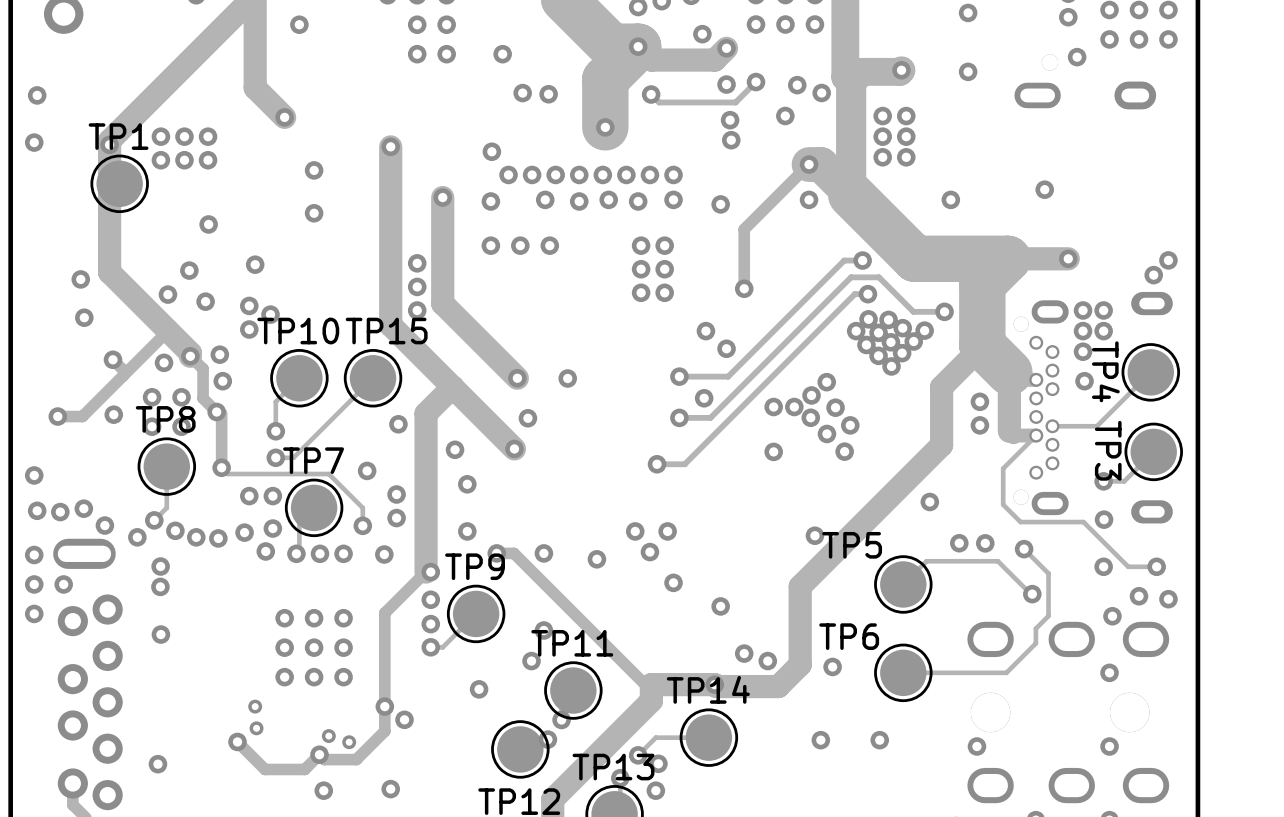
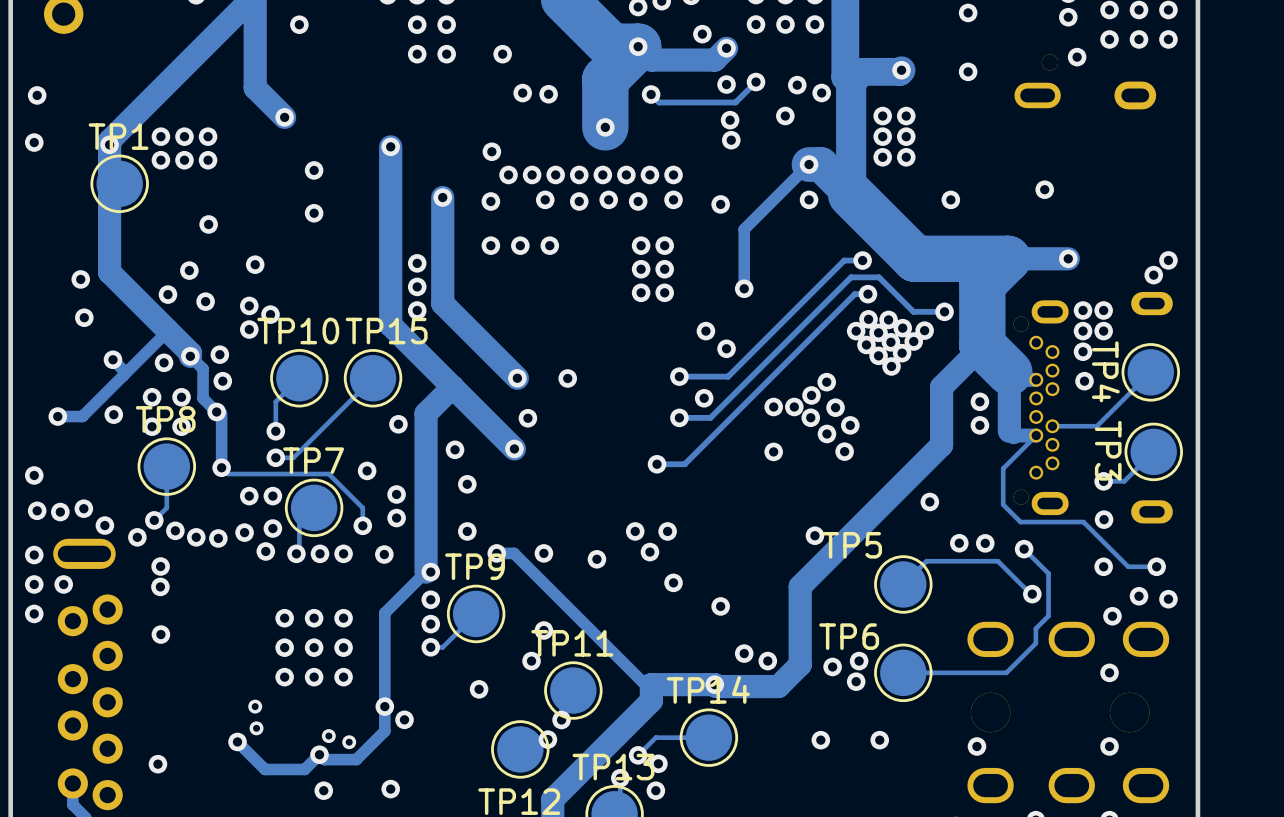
via: none -> (859, 661)
via: none -> (856, 681)

